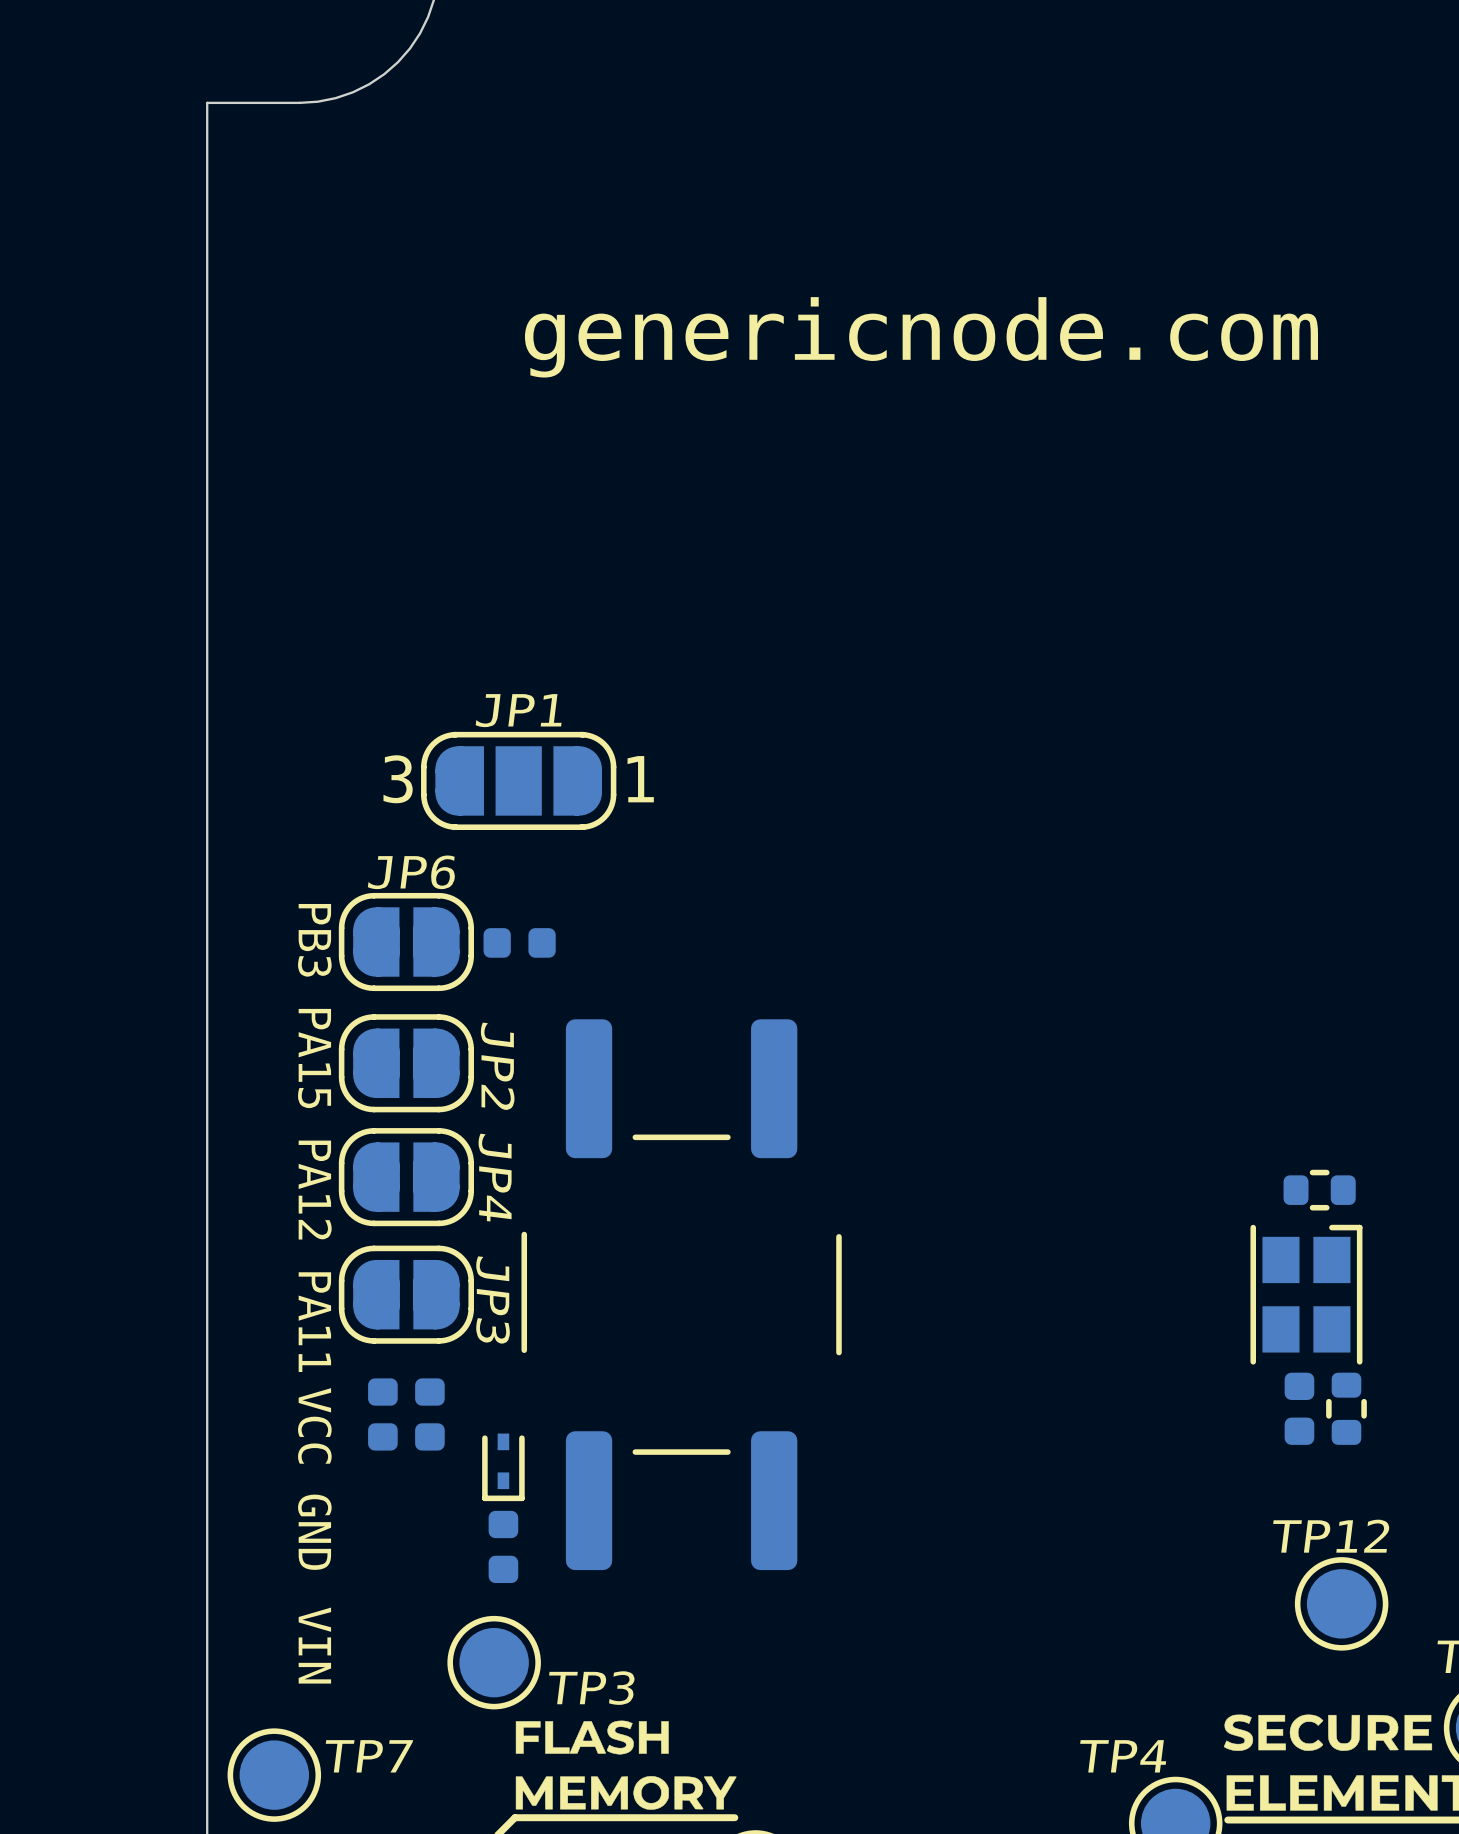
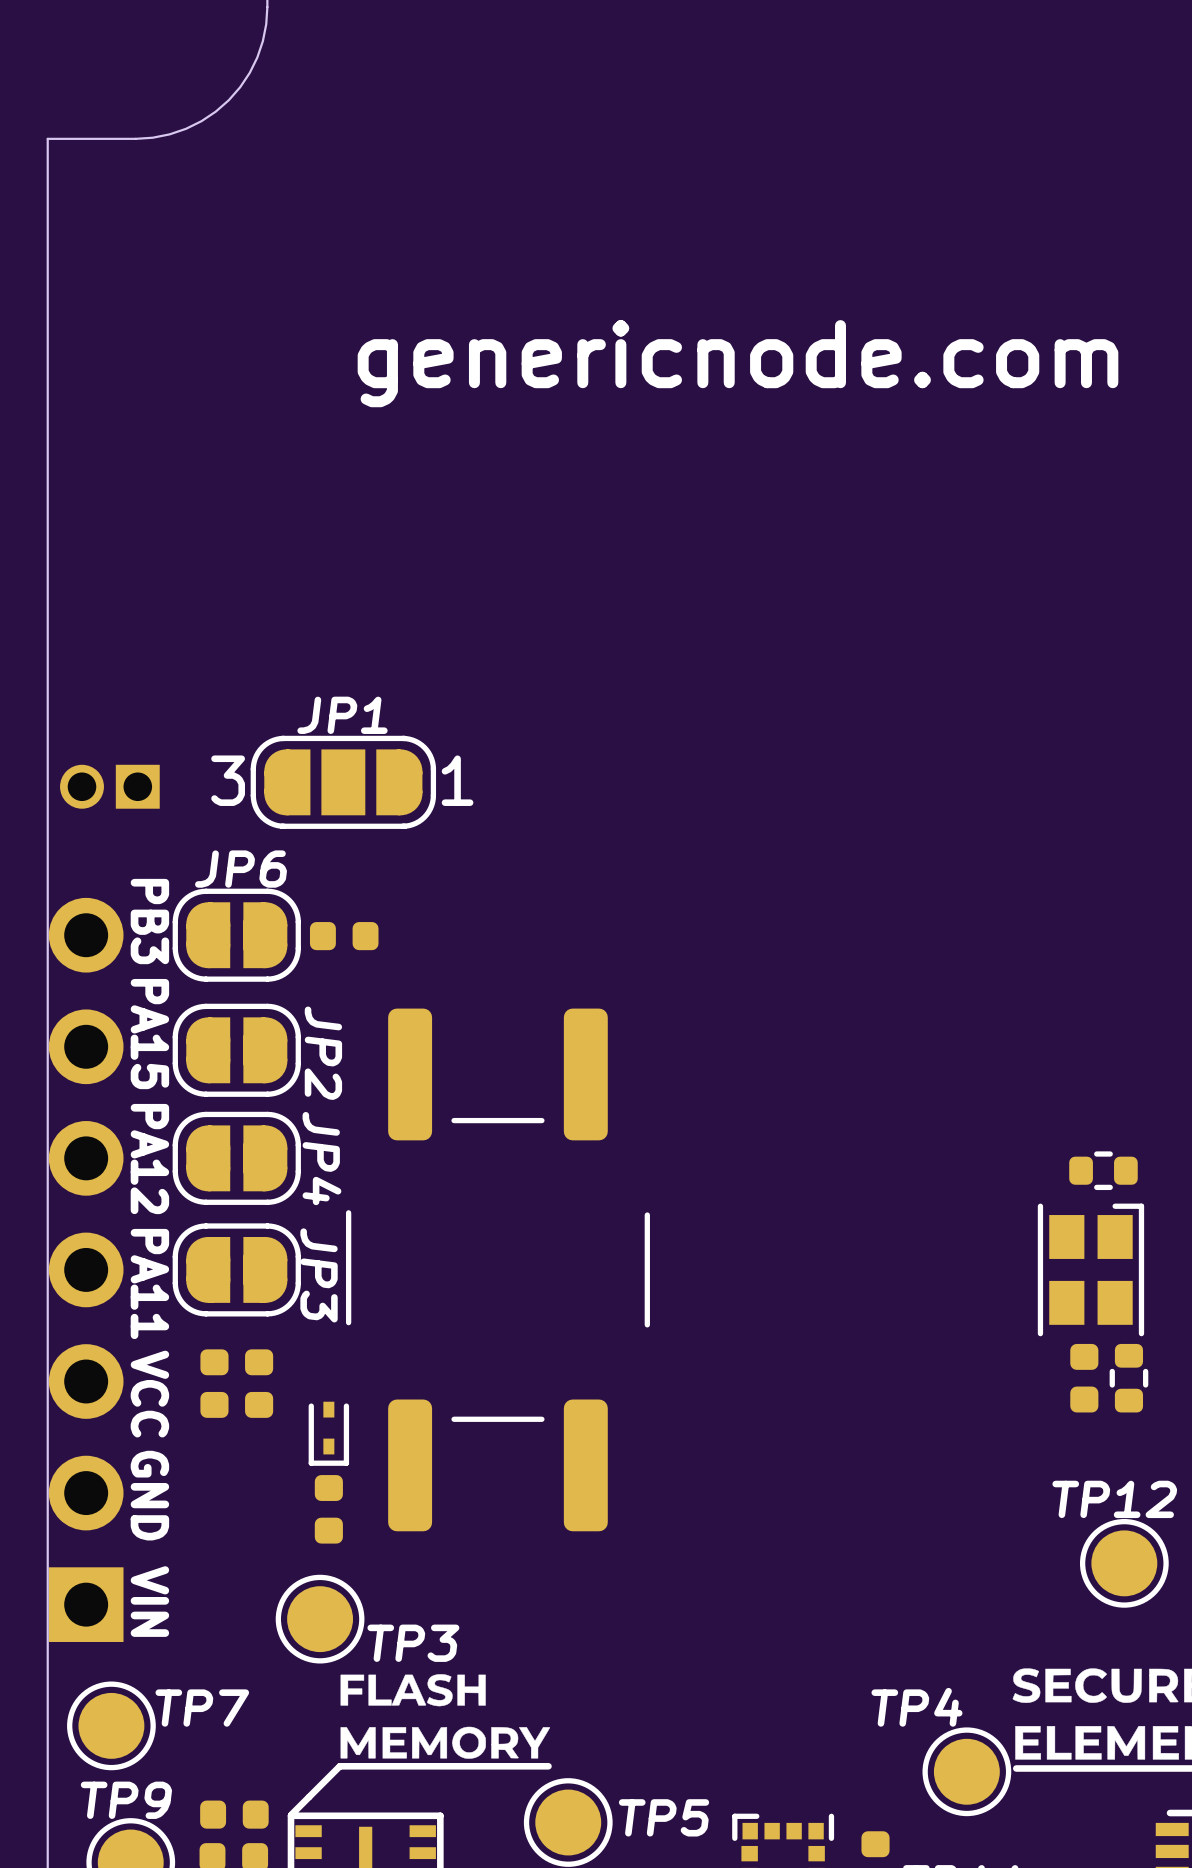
part: none -> (109, 786)
part: none -> (86, 1269)

